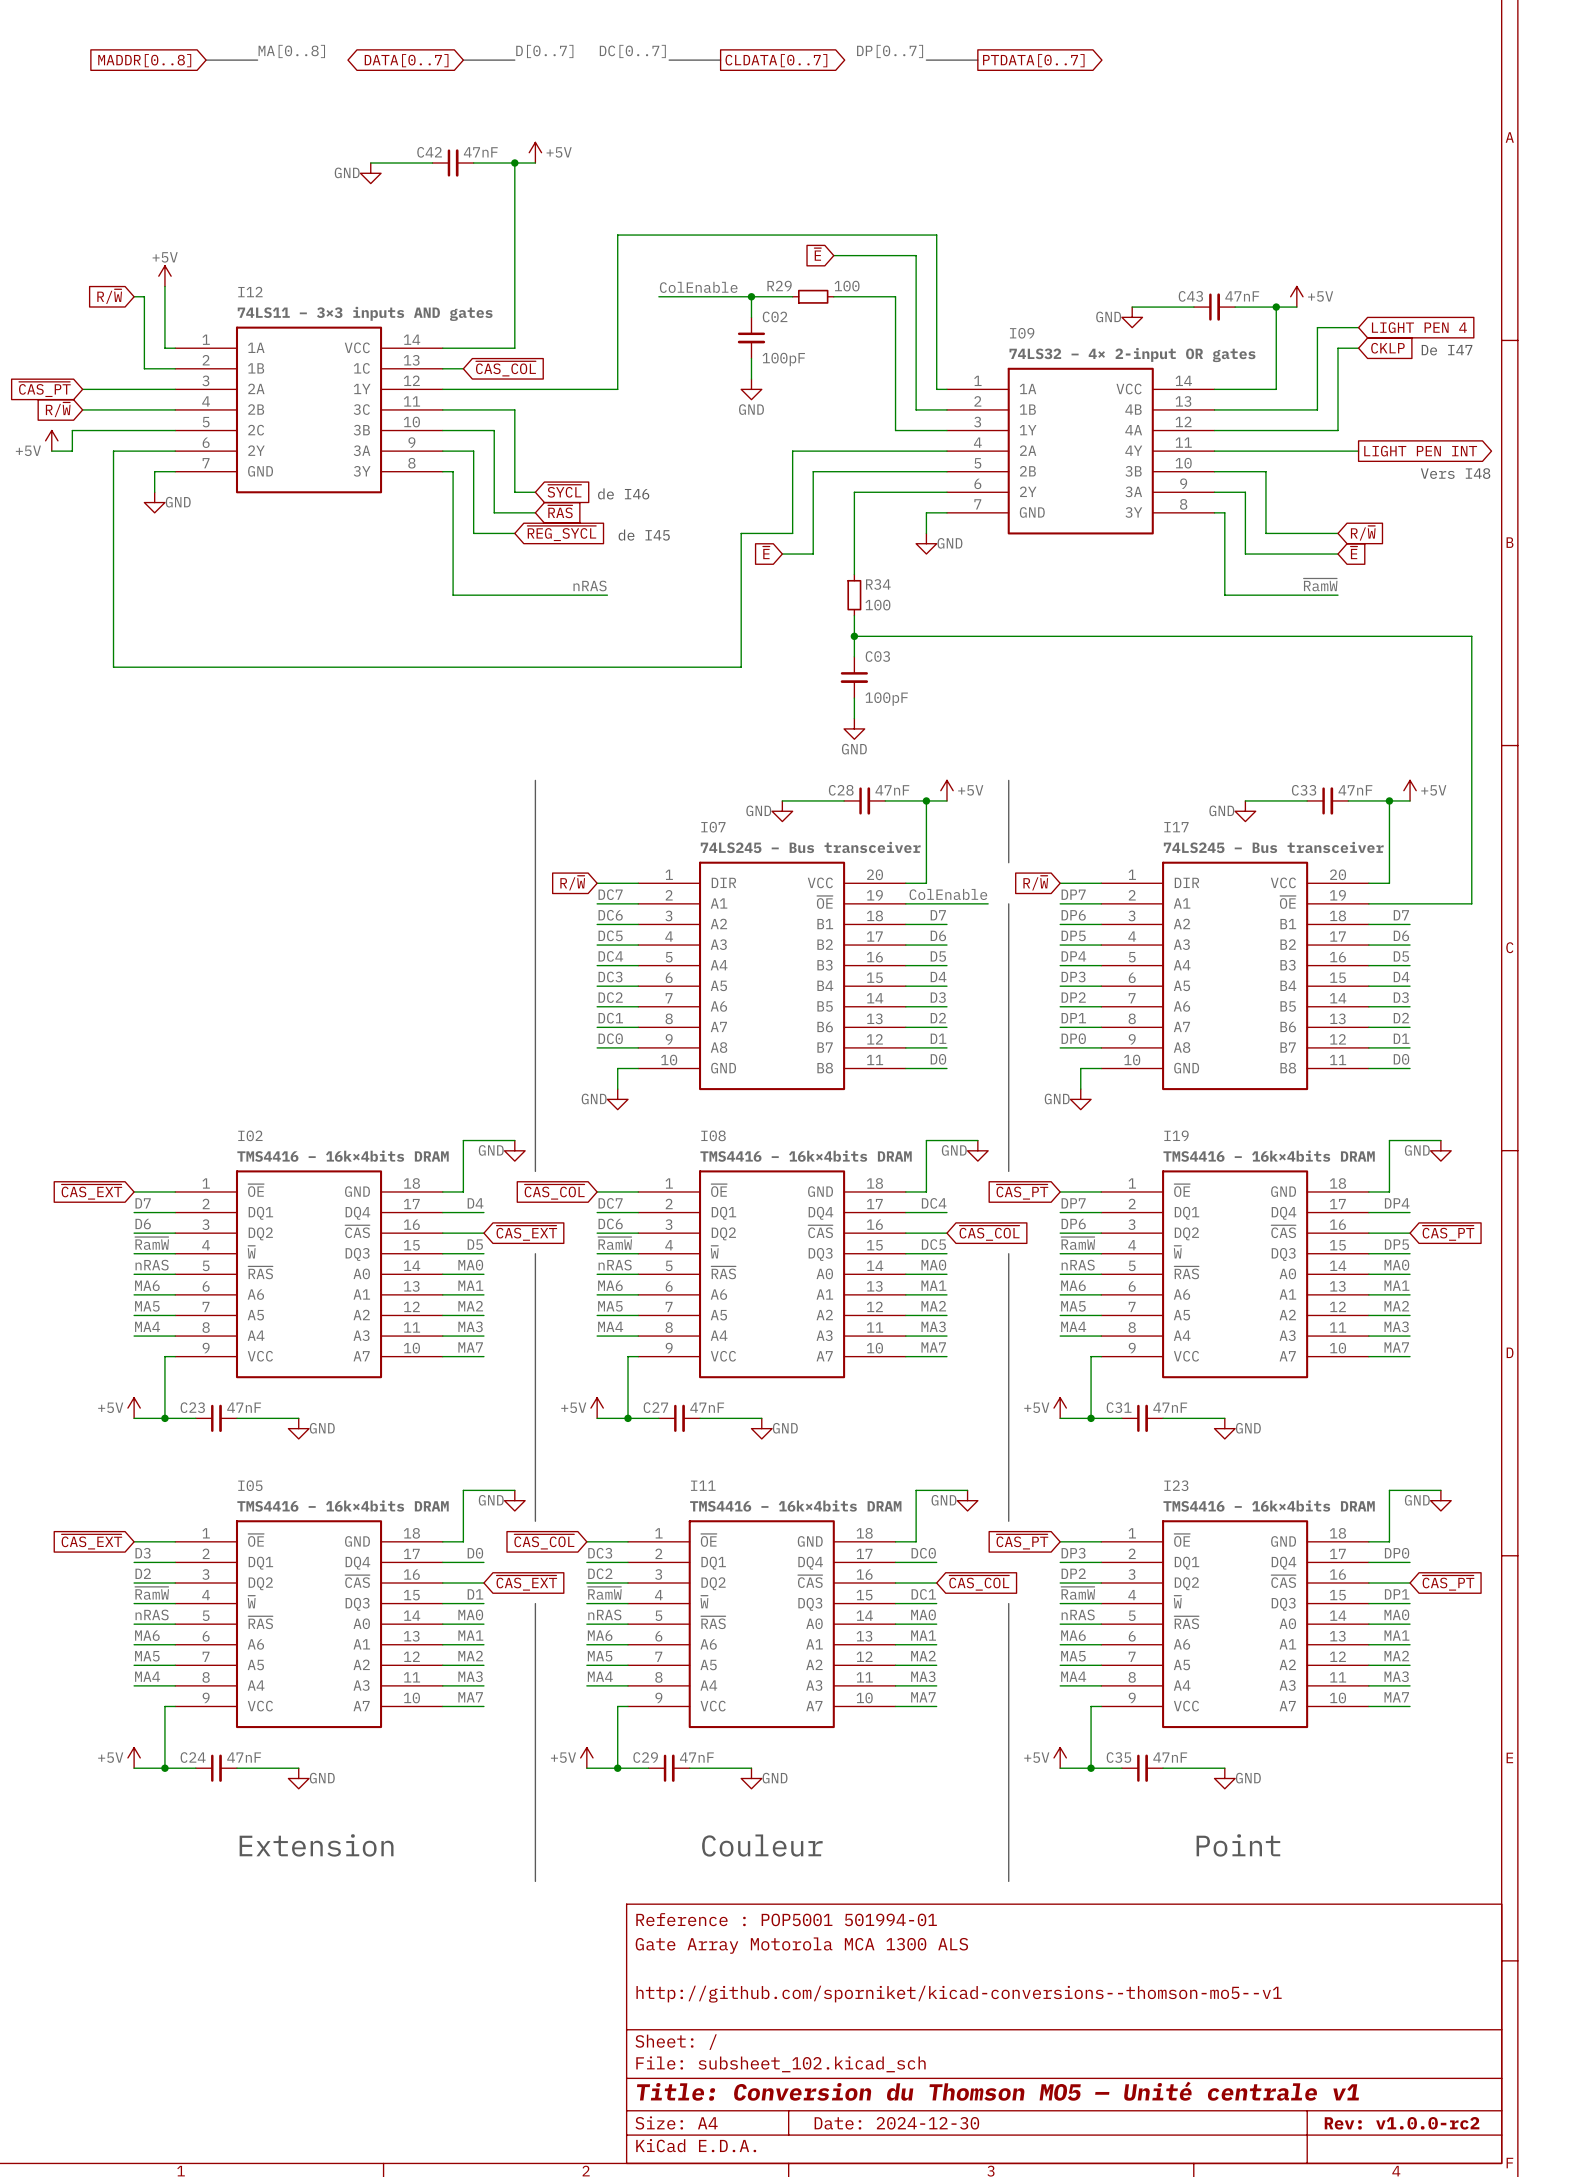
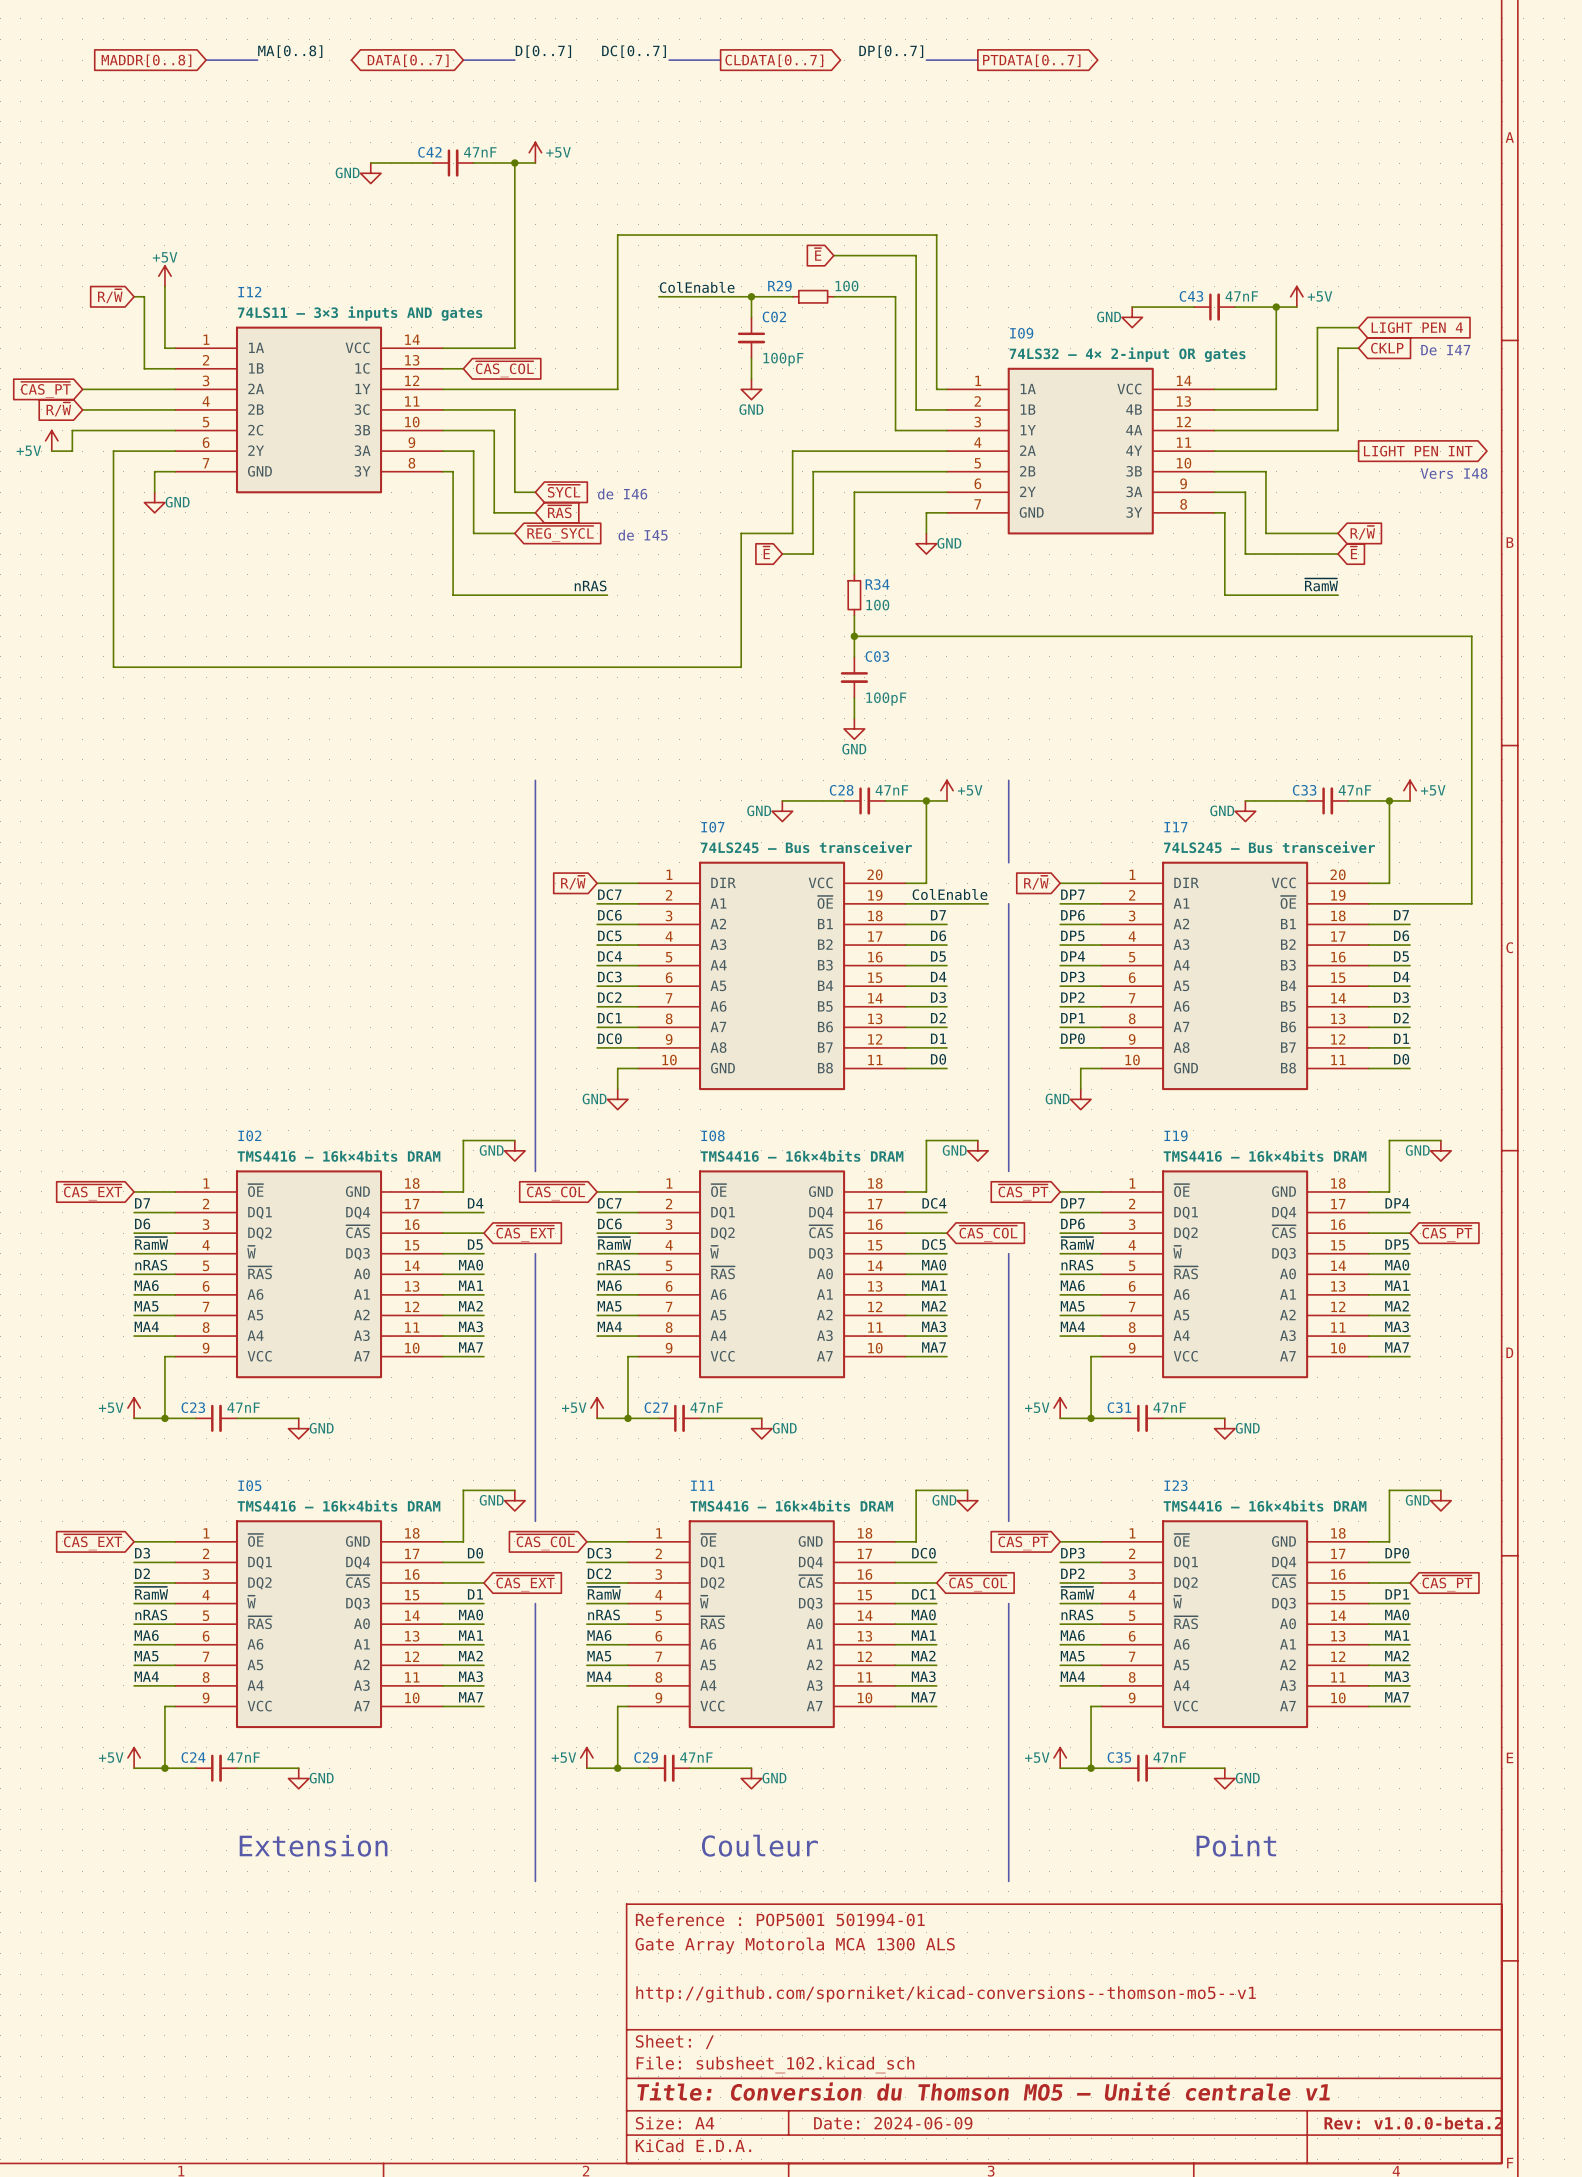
title block: Date: 2024-12-30 (896, 2123) -> Date: 2024-06-09 (893, 2123)
title block: Rev: v1.0.0-rc2 (1402, 2123) -> Rev: v1.0.0-beta.2 (1413, 2123)

